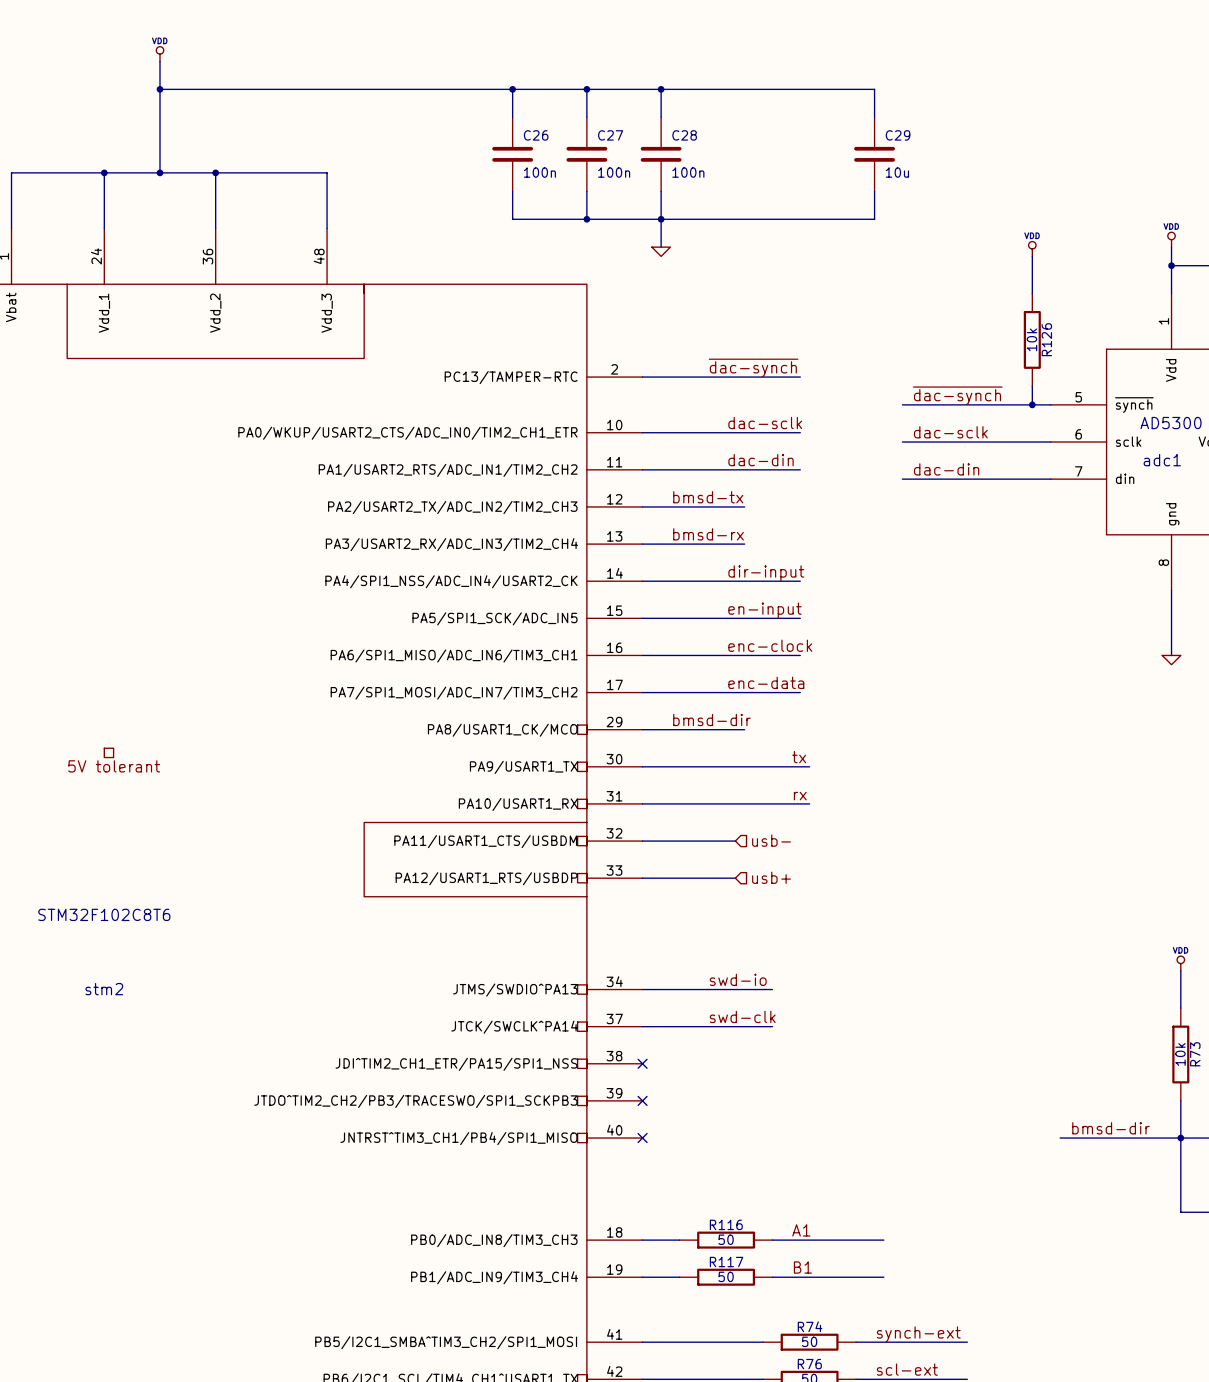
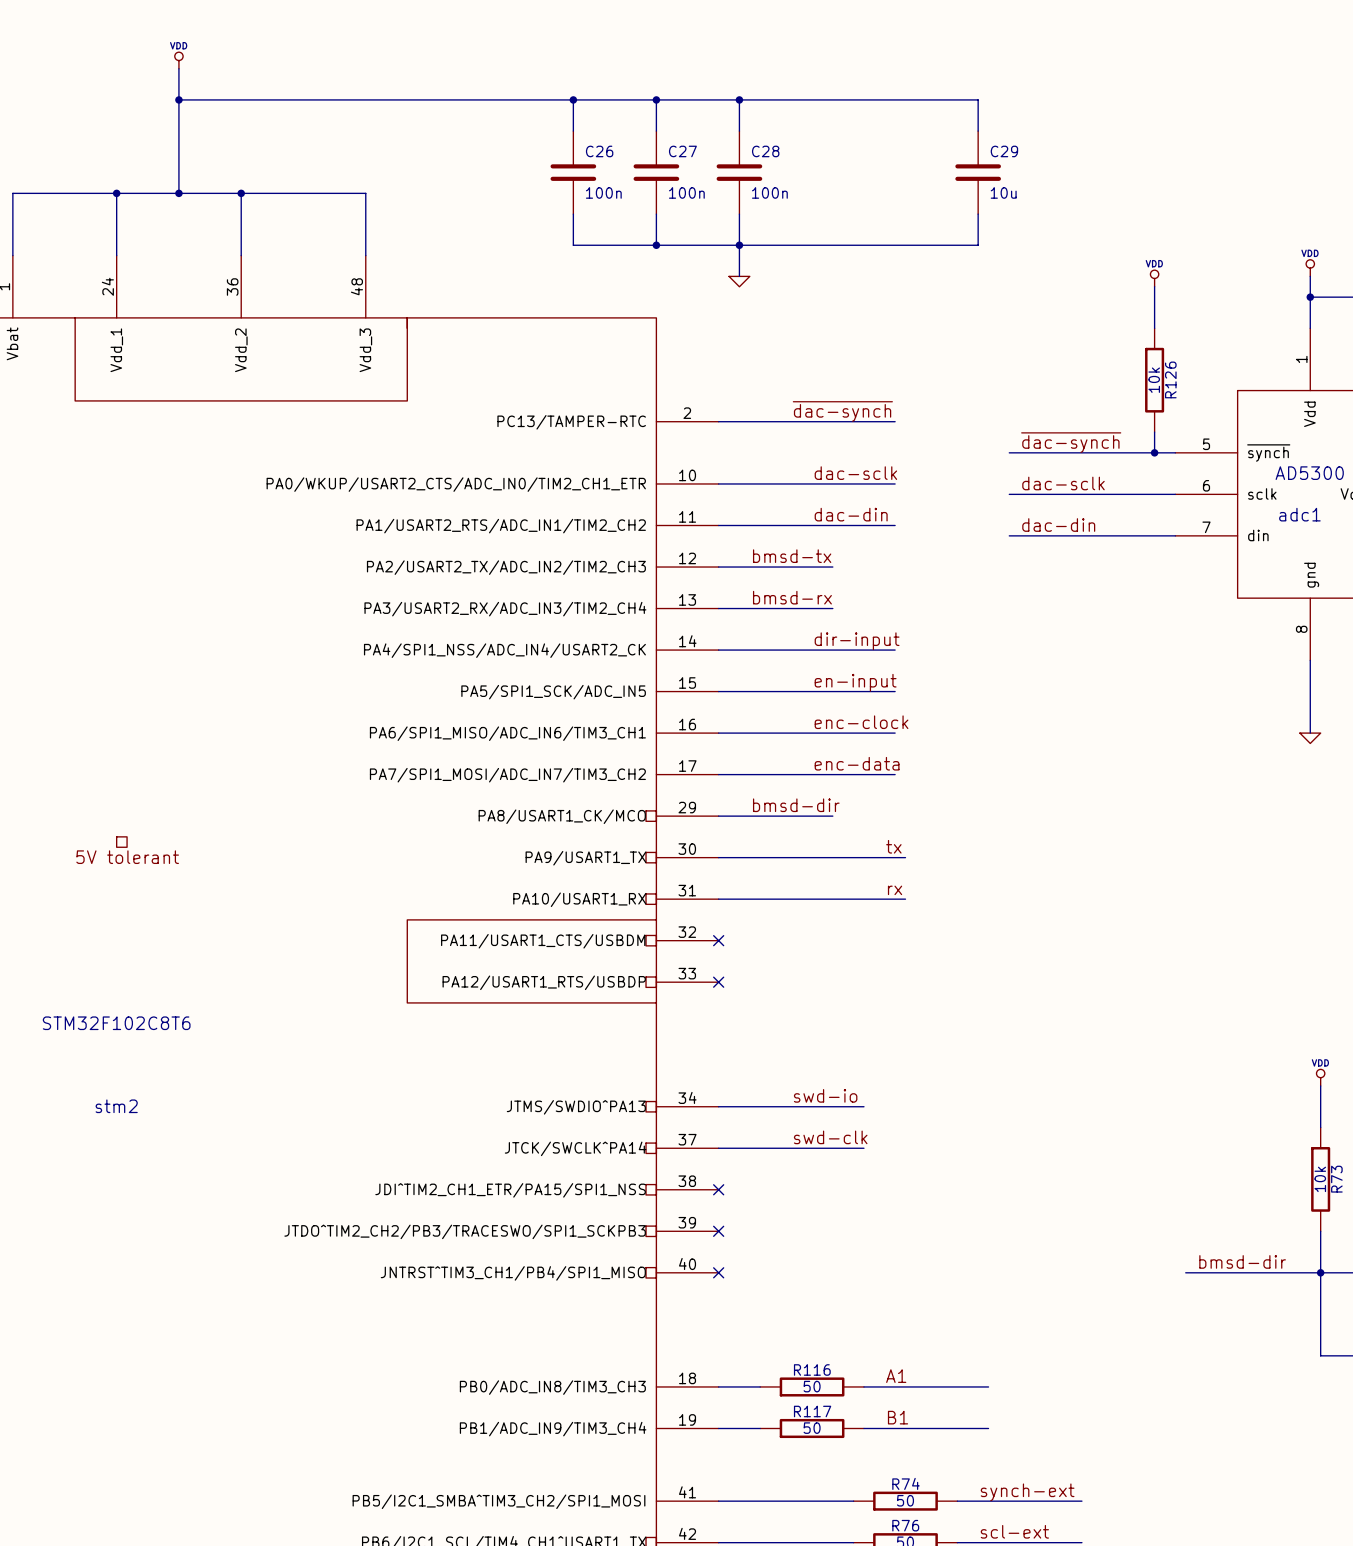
hierarchical label: usb- (771, 840) -> none
wire: (642, 841) (735, 841) -> none
no-connect mark: none -> (718, 940)
hierarchical label: usb+ (771, 877) -> none
wire: (642, 878) (735, 878) -> none
no-connect mark: none -> (718, 982)

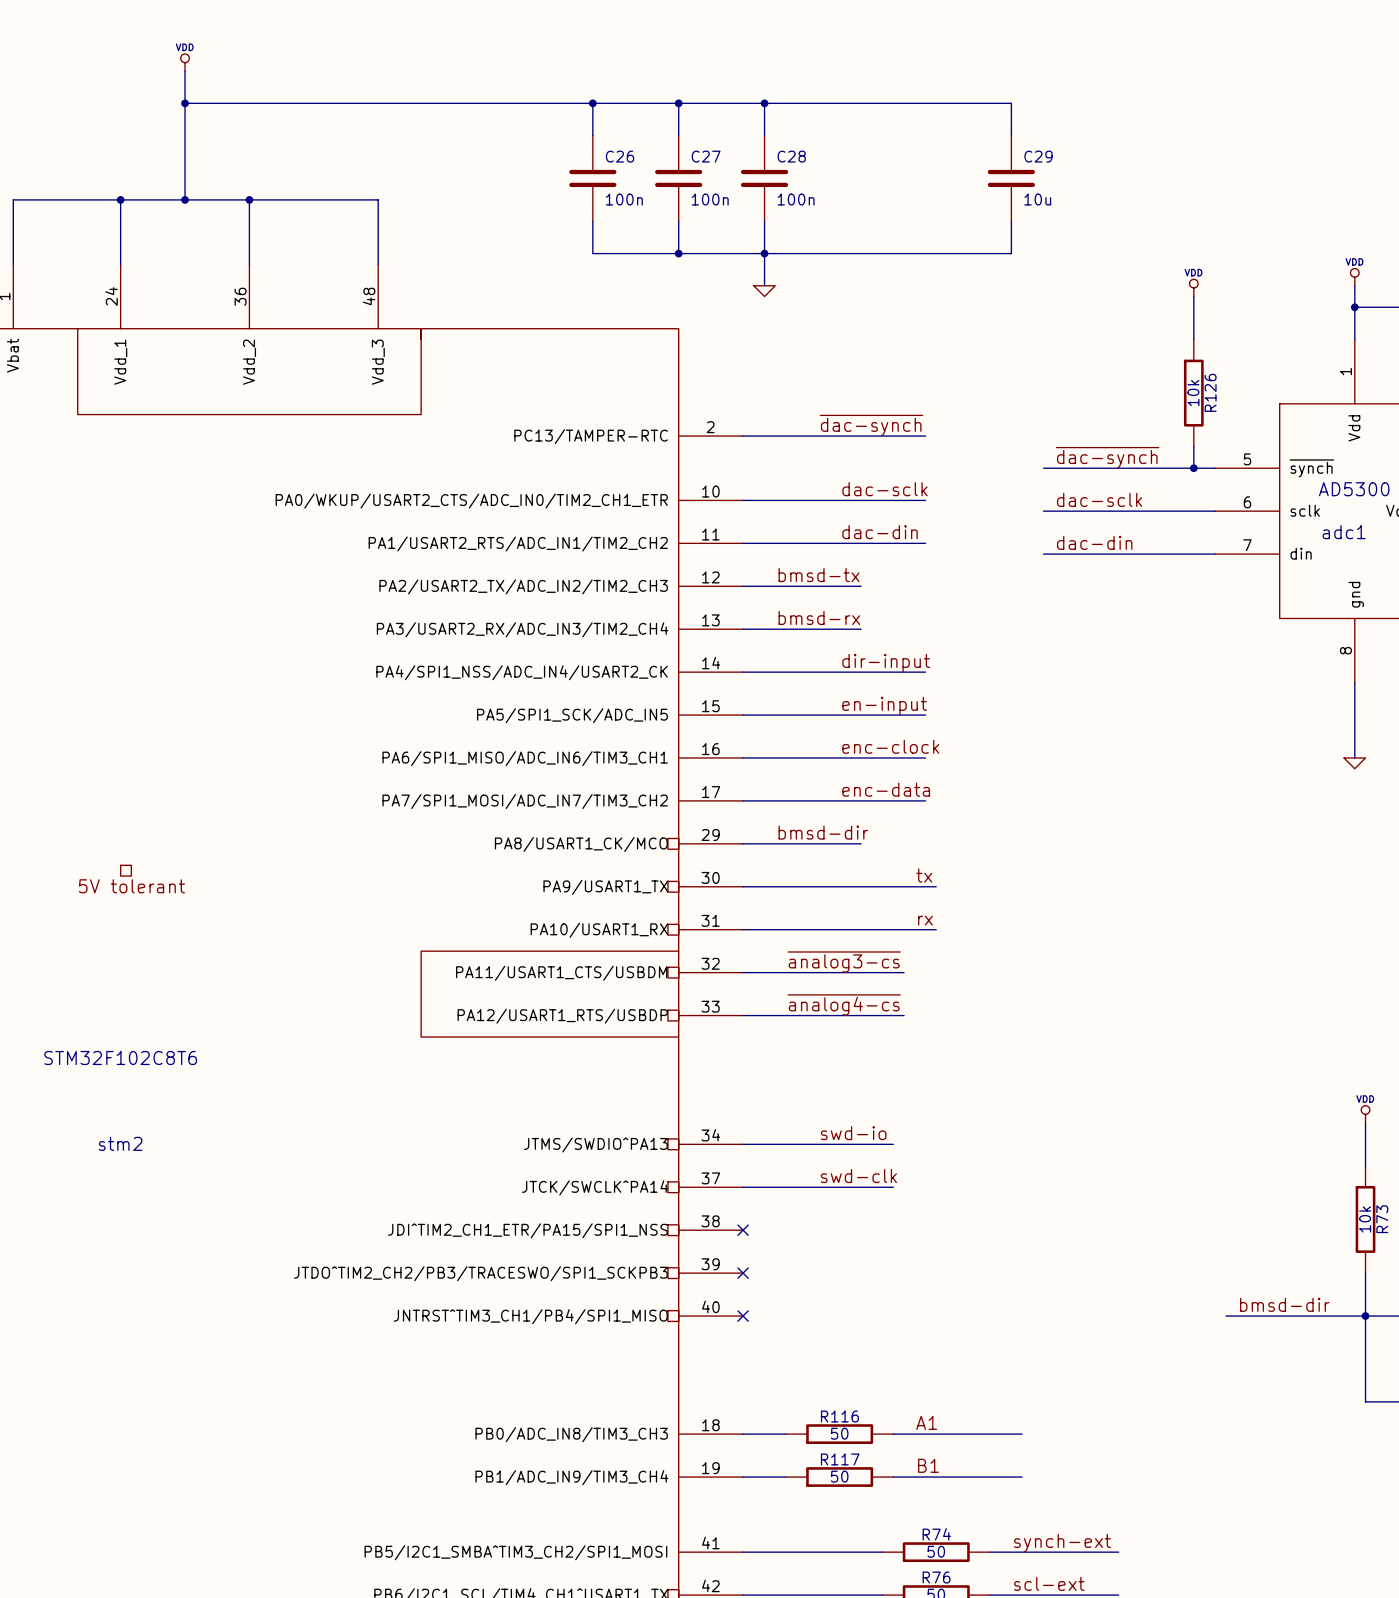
label: none -> ~{analog3-cs} (844, 962)
wire: none -> (743, 972) (904, 972)
no-connect mark: (718, 940) -> none
label: none -> ~{analog4-cs} (844, 1004)
wire: none -> (743, 1015) (904, 1015)
no-connect mark: (718, 982) -> none

